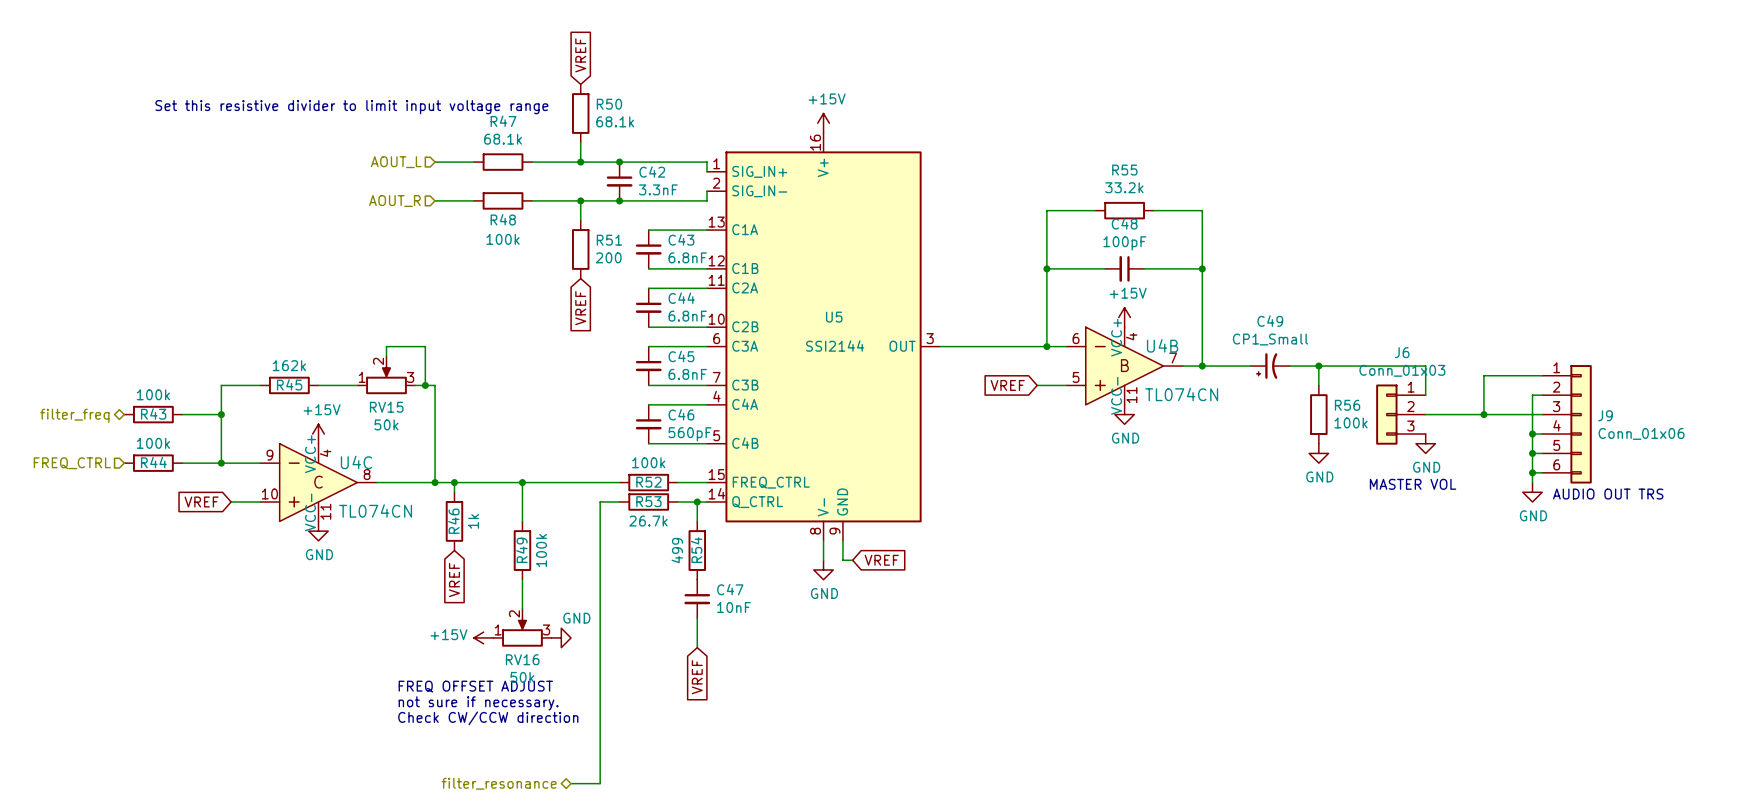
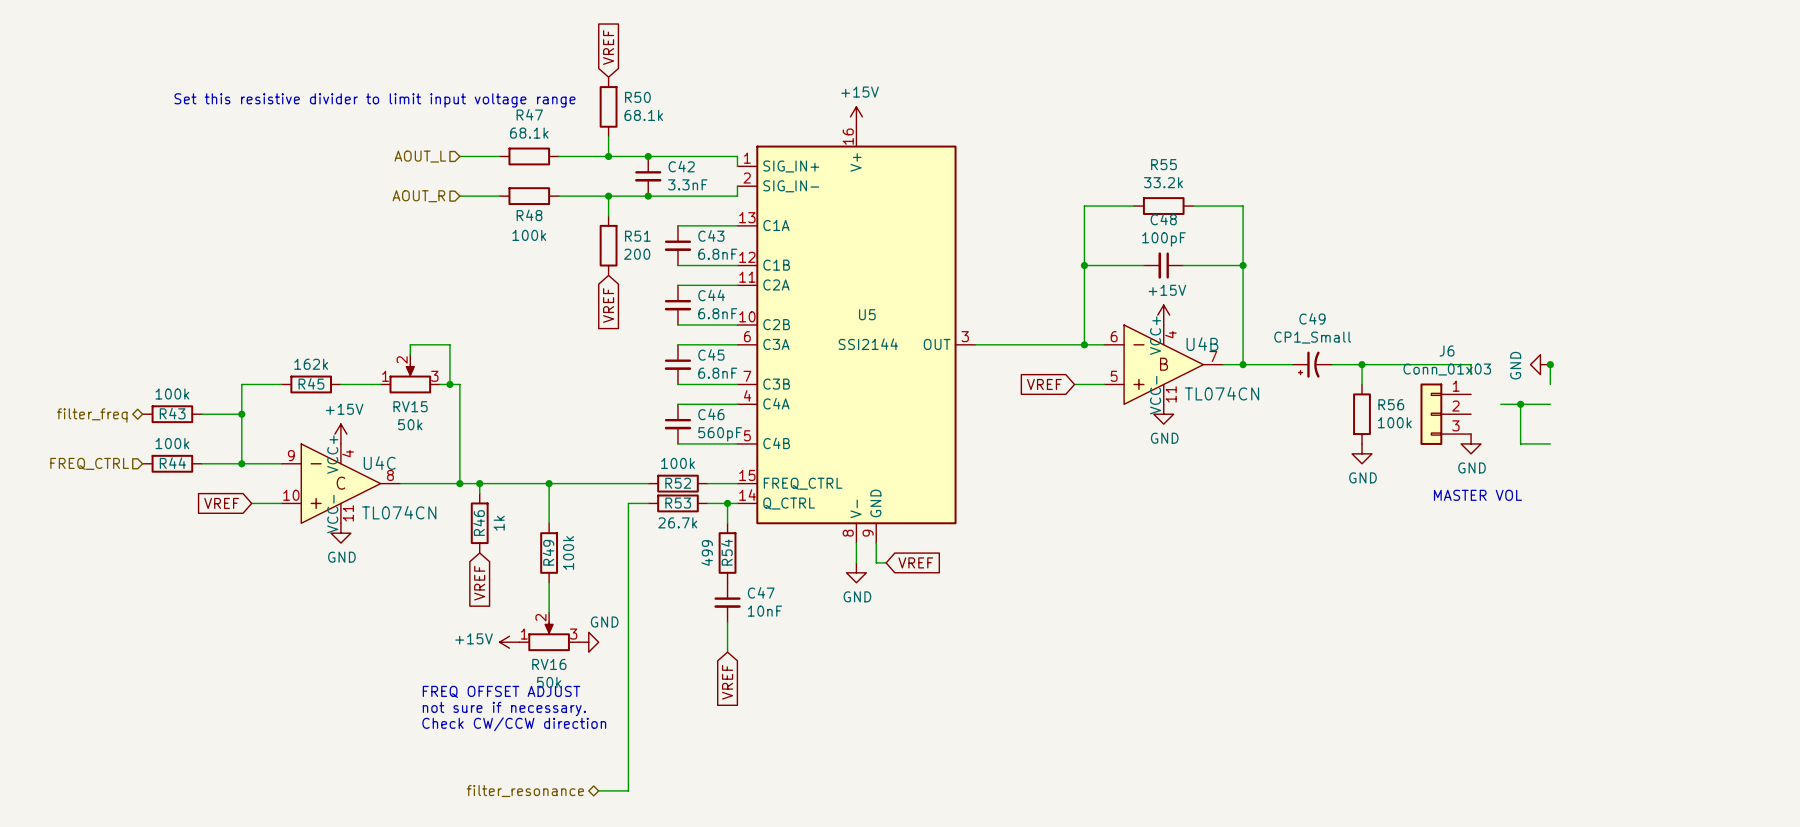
junction: none -> (1550, 364)
wire: (1425, 375) (1425, 395) -> (1550, 364) (1550, 384)
wire: (1542, 375) (1483, 375) (1483, 414) -> none
wire: (1542, 395) (1532, 395) (1532, 482) -> none
wire: none -> (1500, 404) (1550, 404)
wire: none -> (1520, 404) (1520, 443) (1550, 443)
wire: (1425, 414) (1542, 414) -> none
junction position: (1483, 414) -> (1520, 404)
J9: Conn_01x06 (1566, 424) -> none
wire: (1532, 434) (1542, 434) -> none
junction: (1532, 434) -> none
wire: (1532, 453) (1542, 453) -> none
junction: (1532, 453) -> none
wire: (1532, 472) (1542, 472) -> none
junction: (1532, 472) -> none
text position: MASTER VOL (1413, 484) -> MASTER VOL (1477, 495)
power symbol rotation: 0° (1532, 492) -> 90° clockwise (1540, 364)
power symbol position: GND (1532, 492) -> GND (1540, 364)
text: AUDIO OUT TRS (1608, 494) -> none

